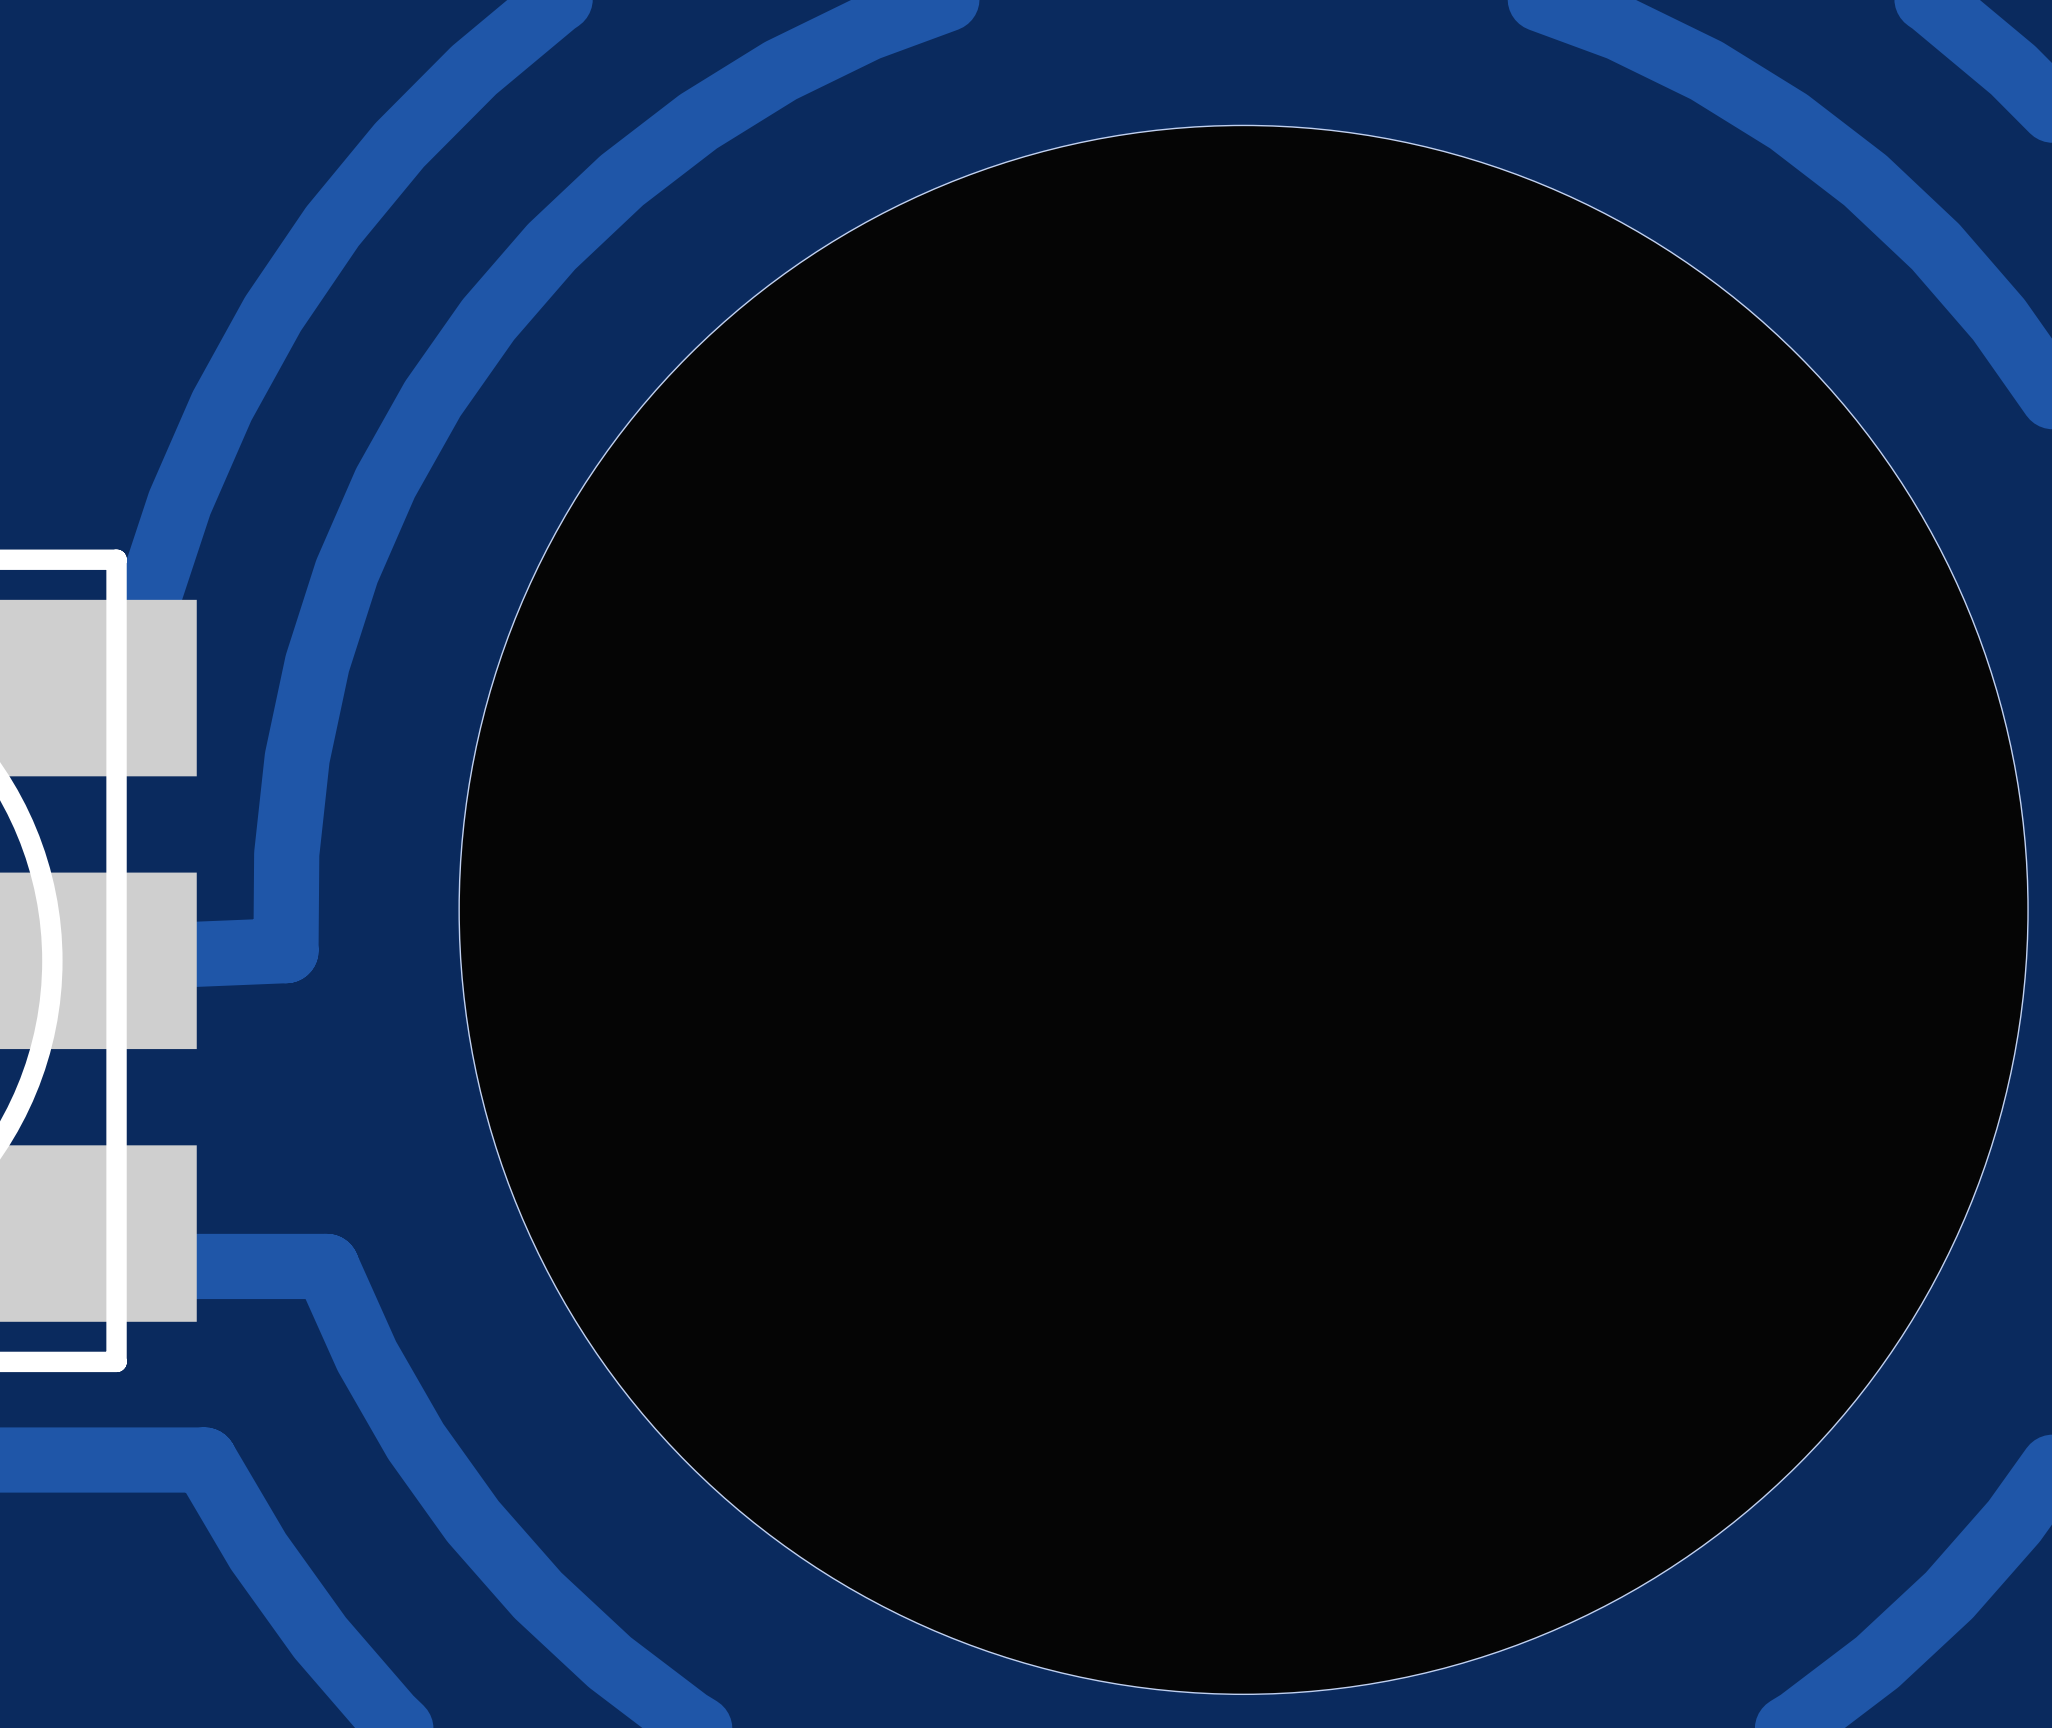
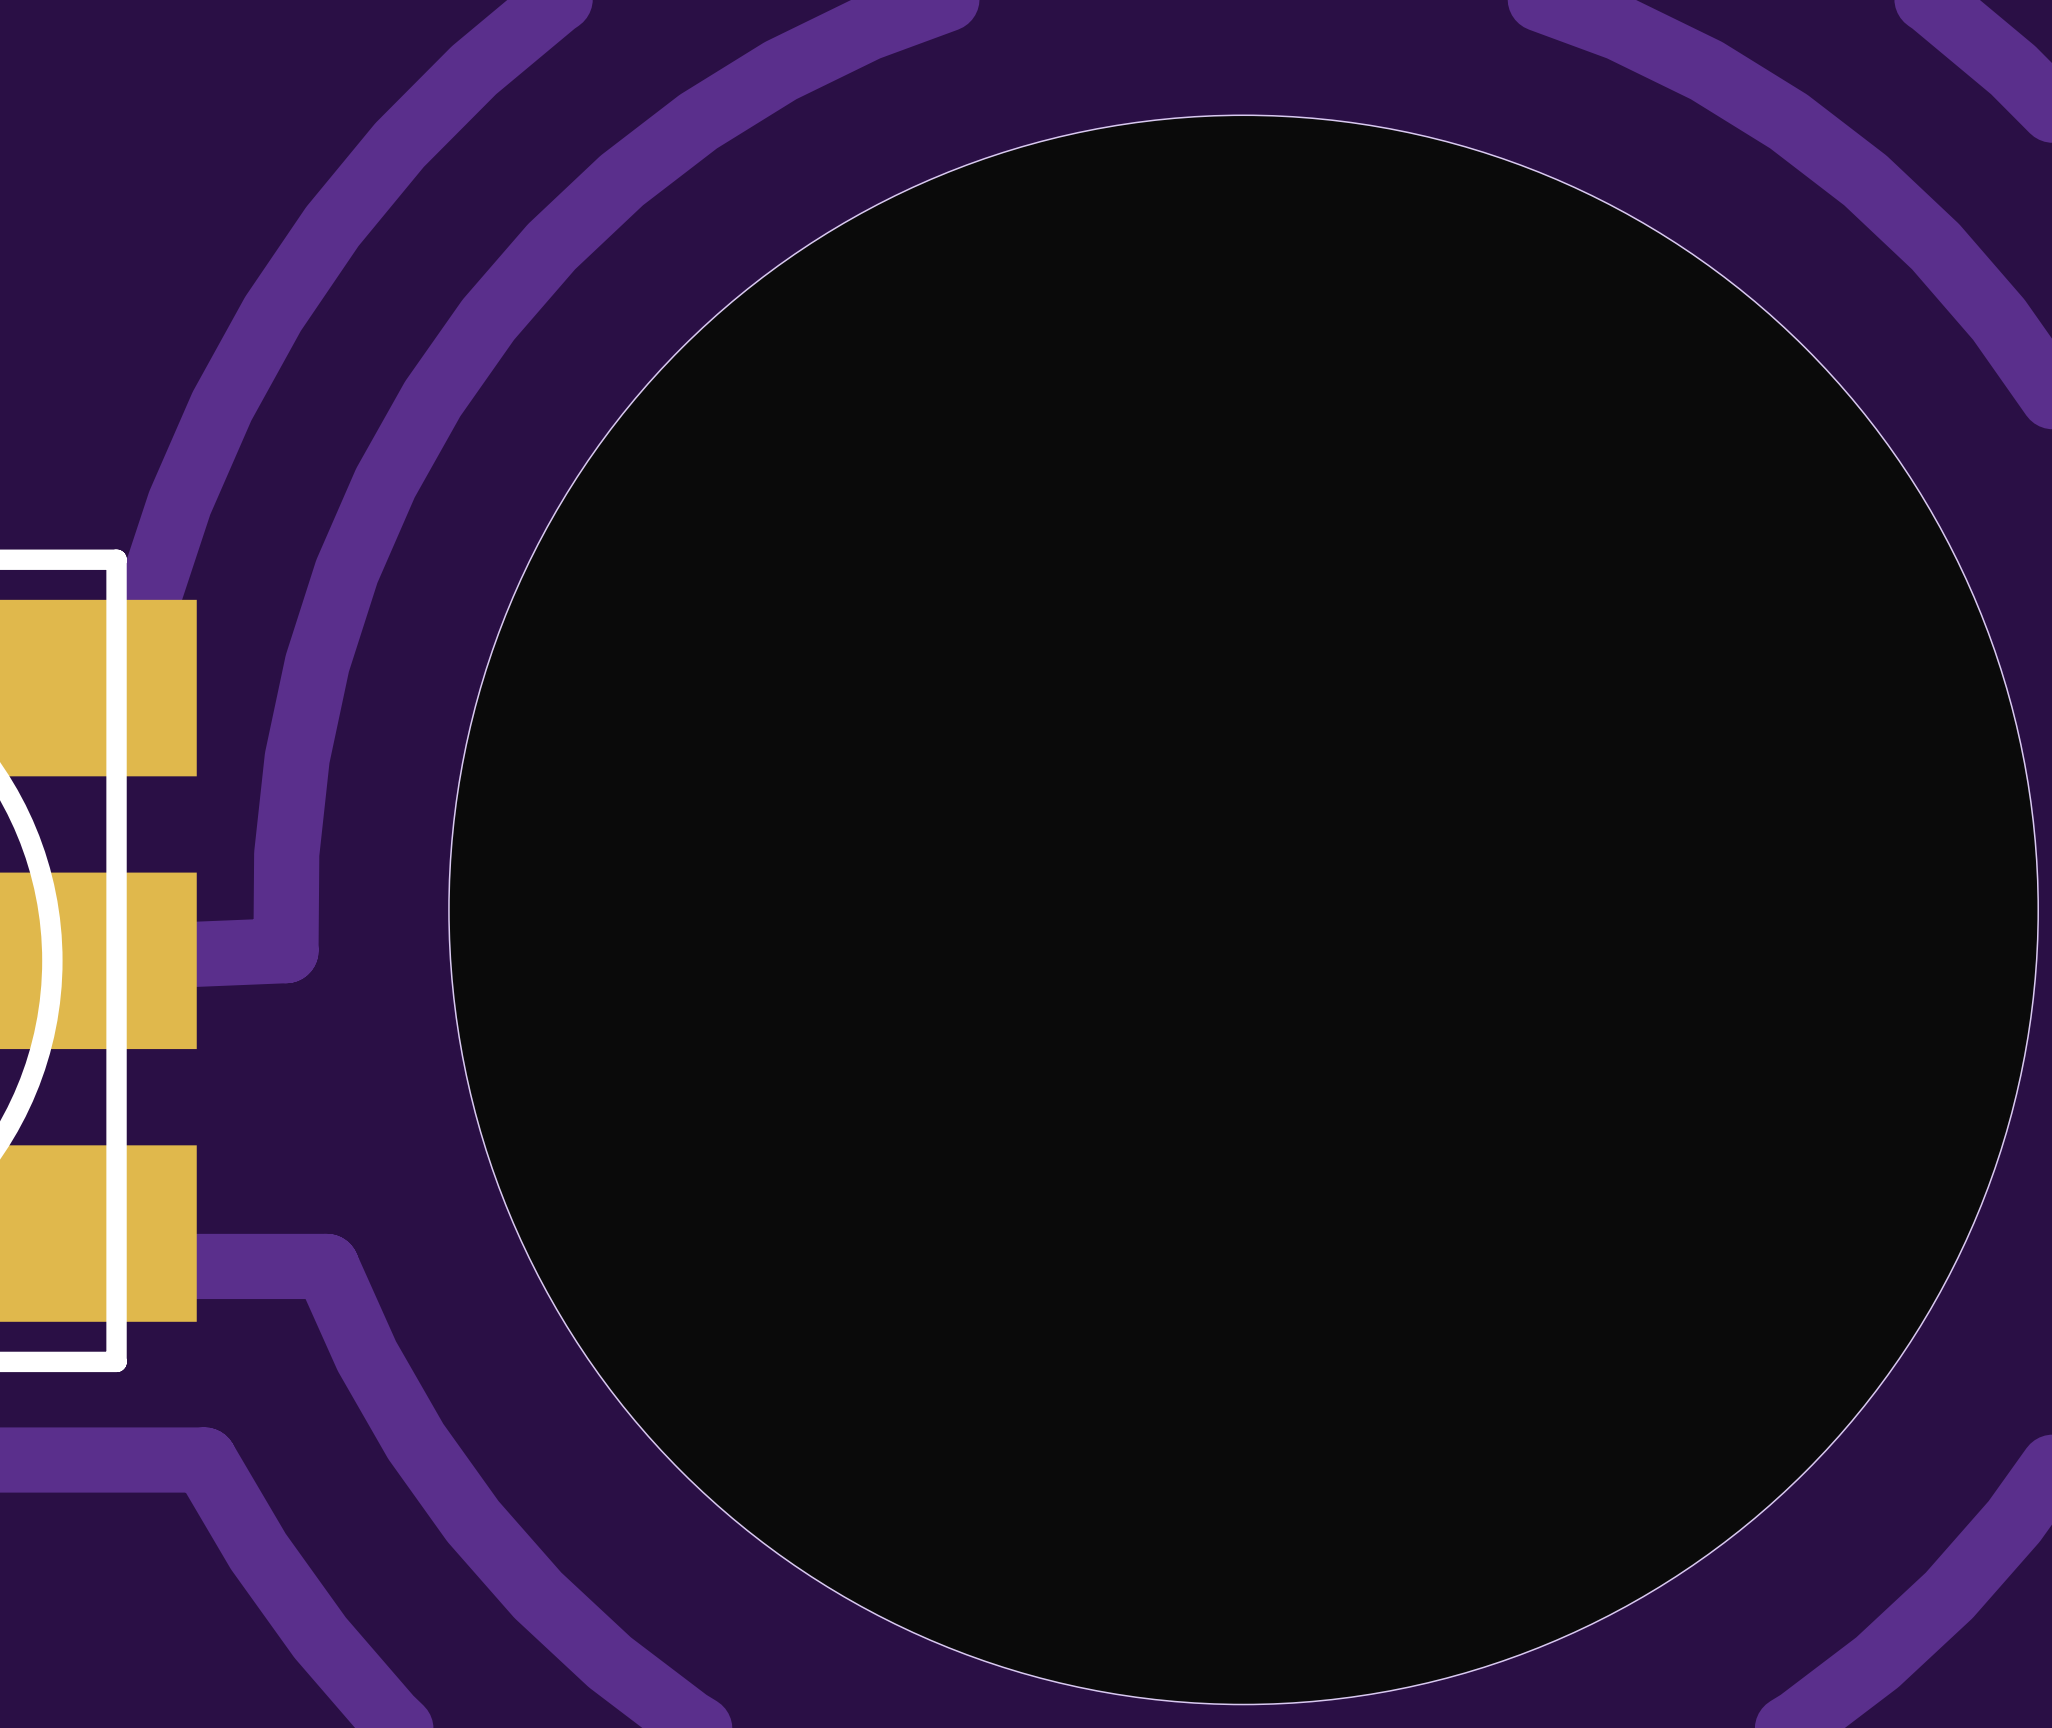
hole size: [459, 125, 2029, 1695] -> [448, 115, 2039, 1705]

